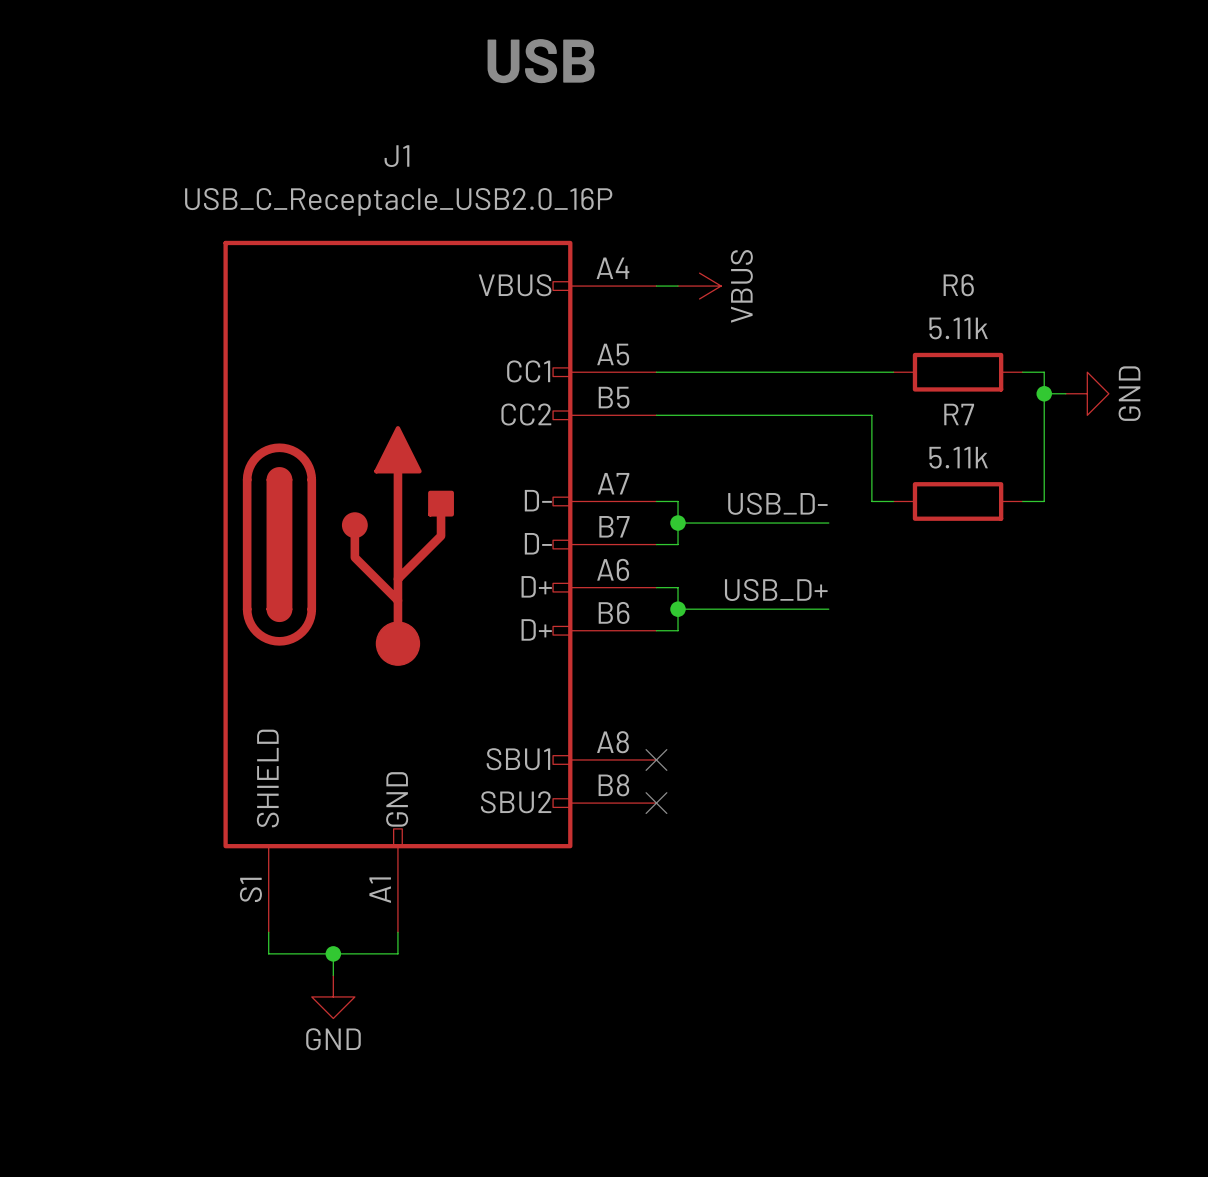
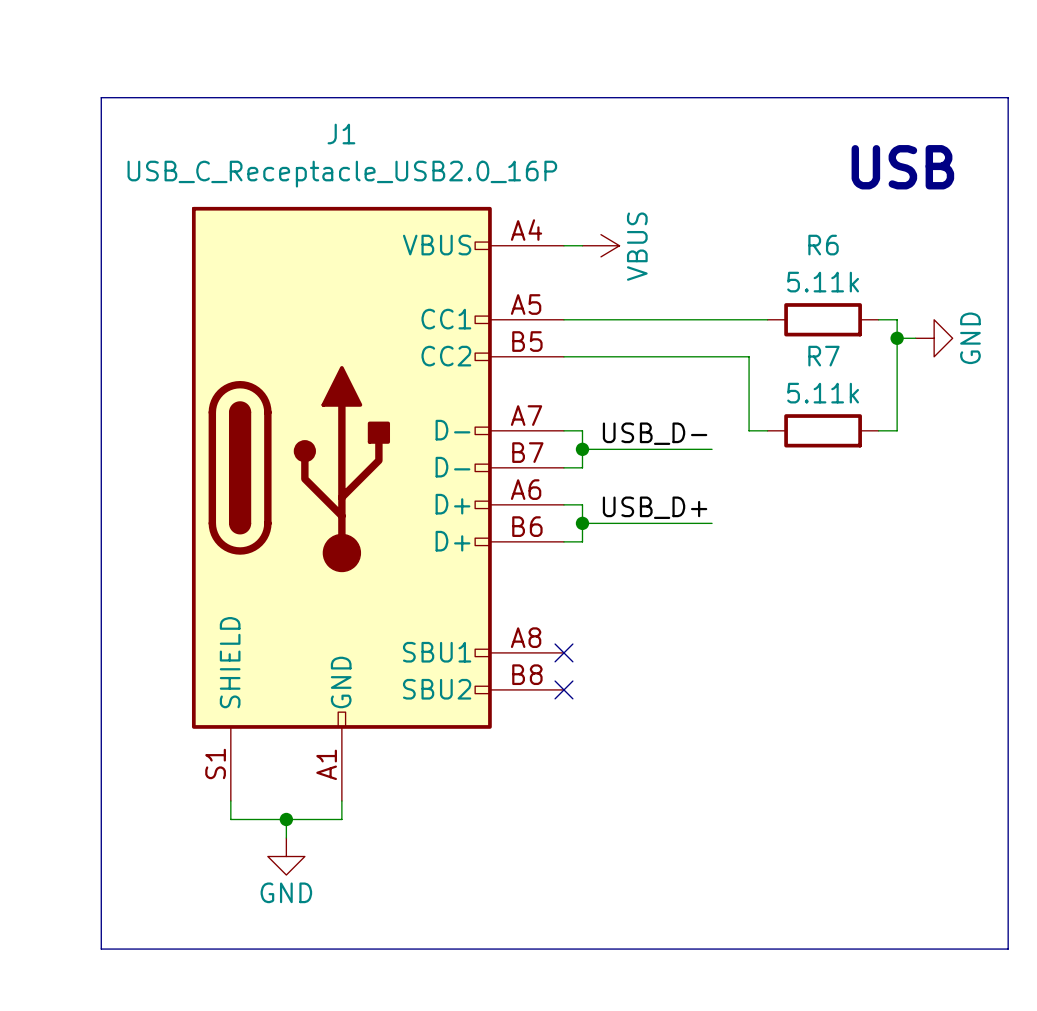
text: USB (541, 61) -> none
line: none -> (101, 97) (1008, 97) (1008, 949) (101, 949) (101, 97)
text: none -> USB (902, 167)

